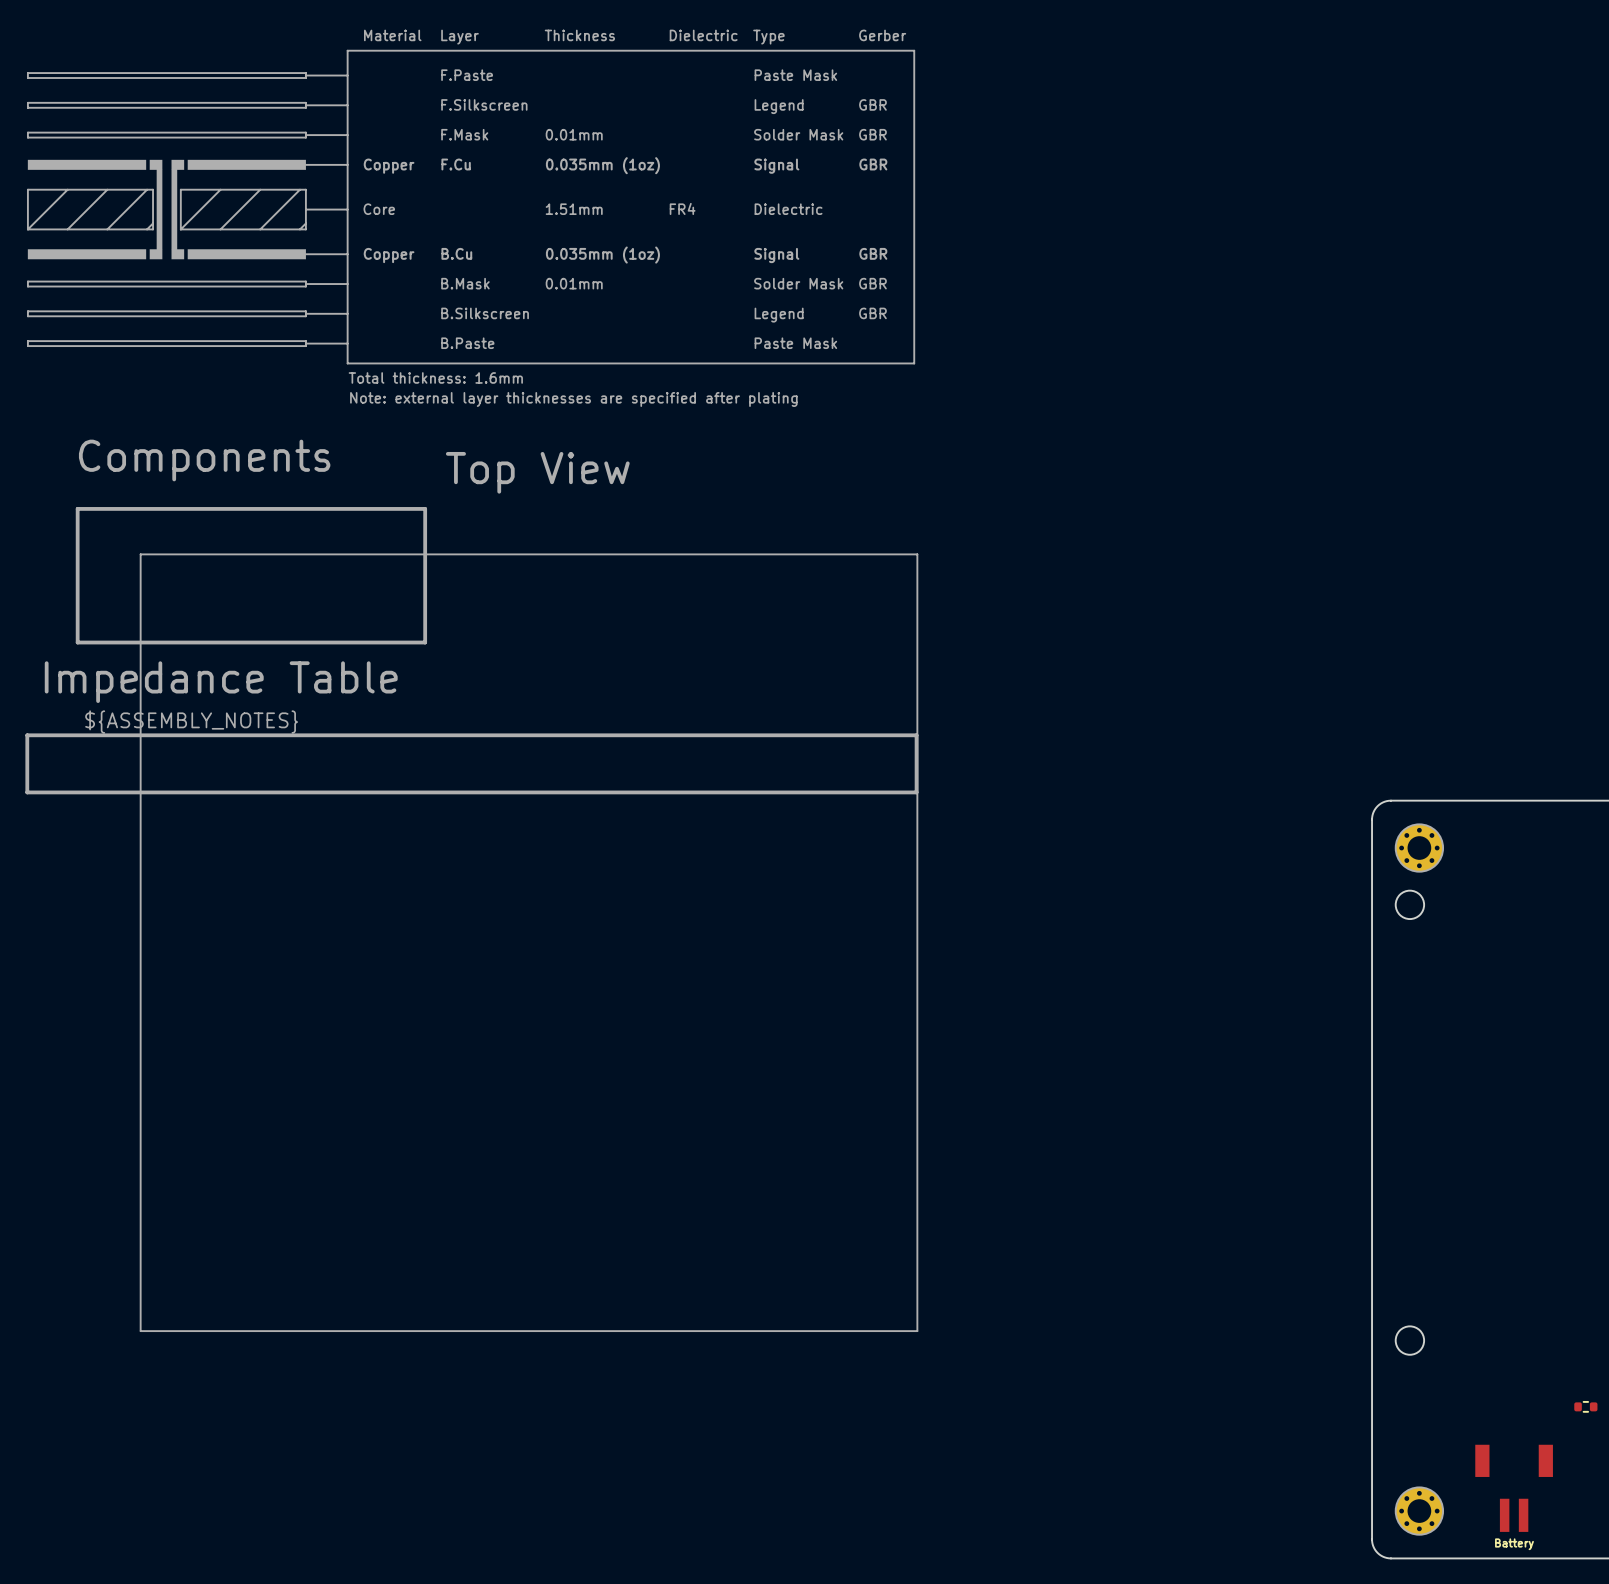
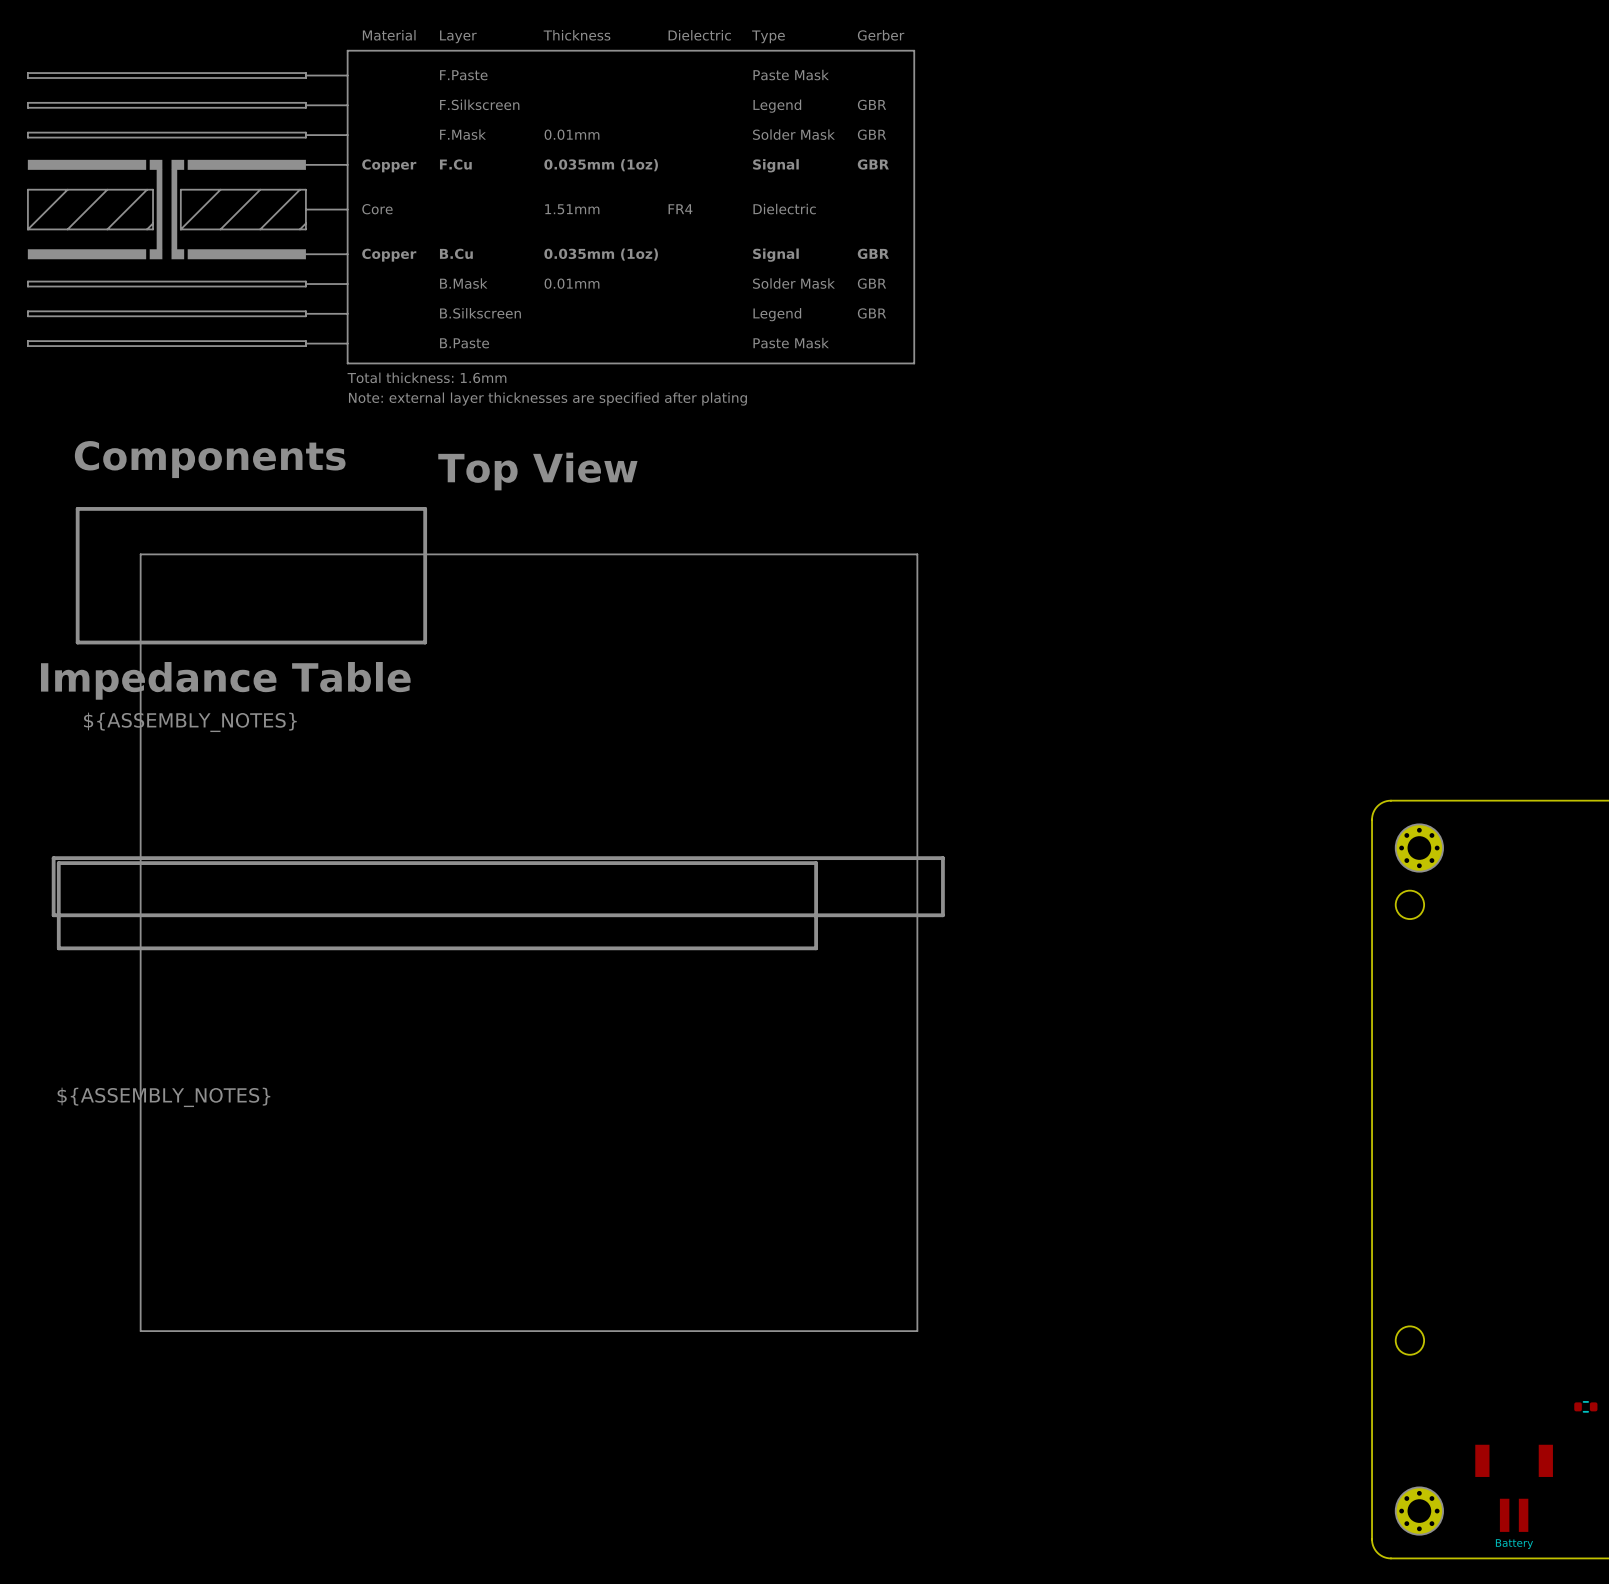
line: (27, 735) (916, 735) (916, 792) (27, 792) (27, 735) -> (53, 858) (942, 858) (942, 915) (53, 915) (53, 858)
line: none -> (58, 863) (816, 863) (816, 948) (58, 948) (58, 863)
text: none -> ${ASSEMBLY_NOTES} (163, 1097)

